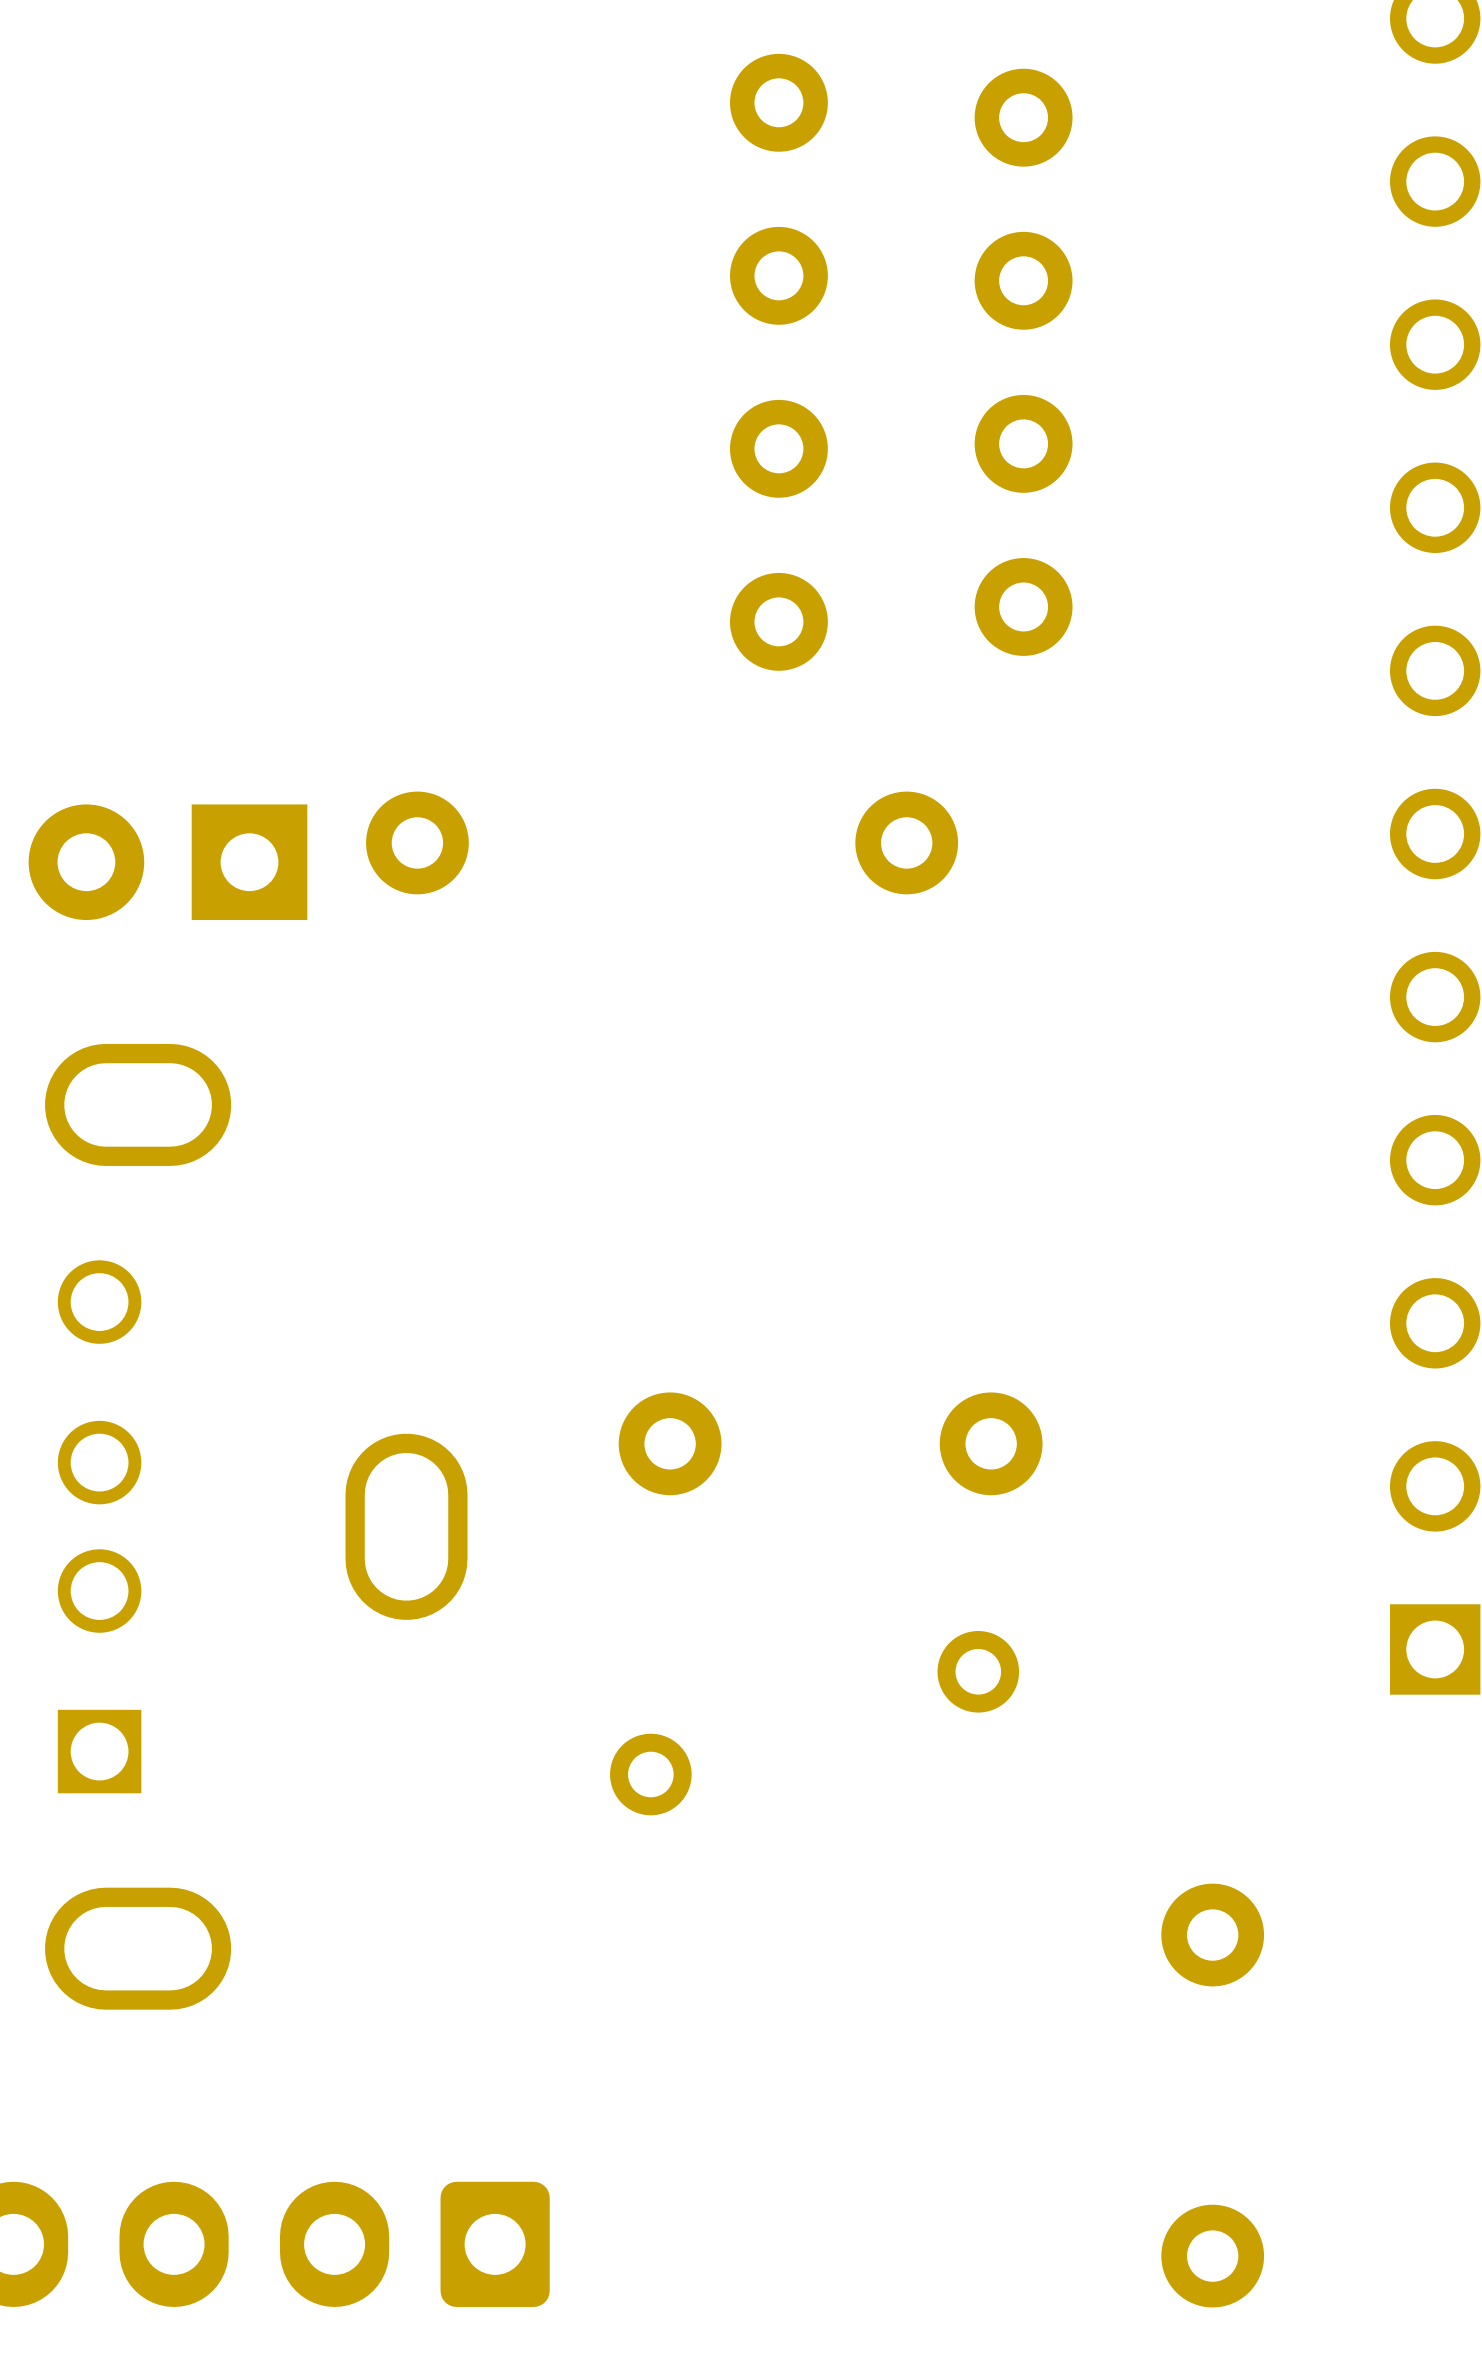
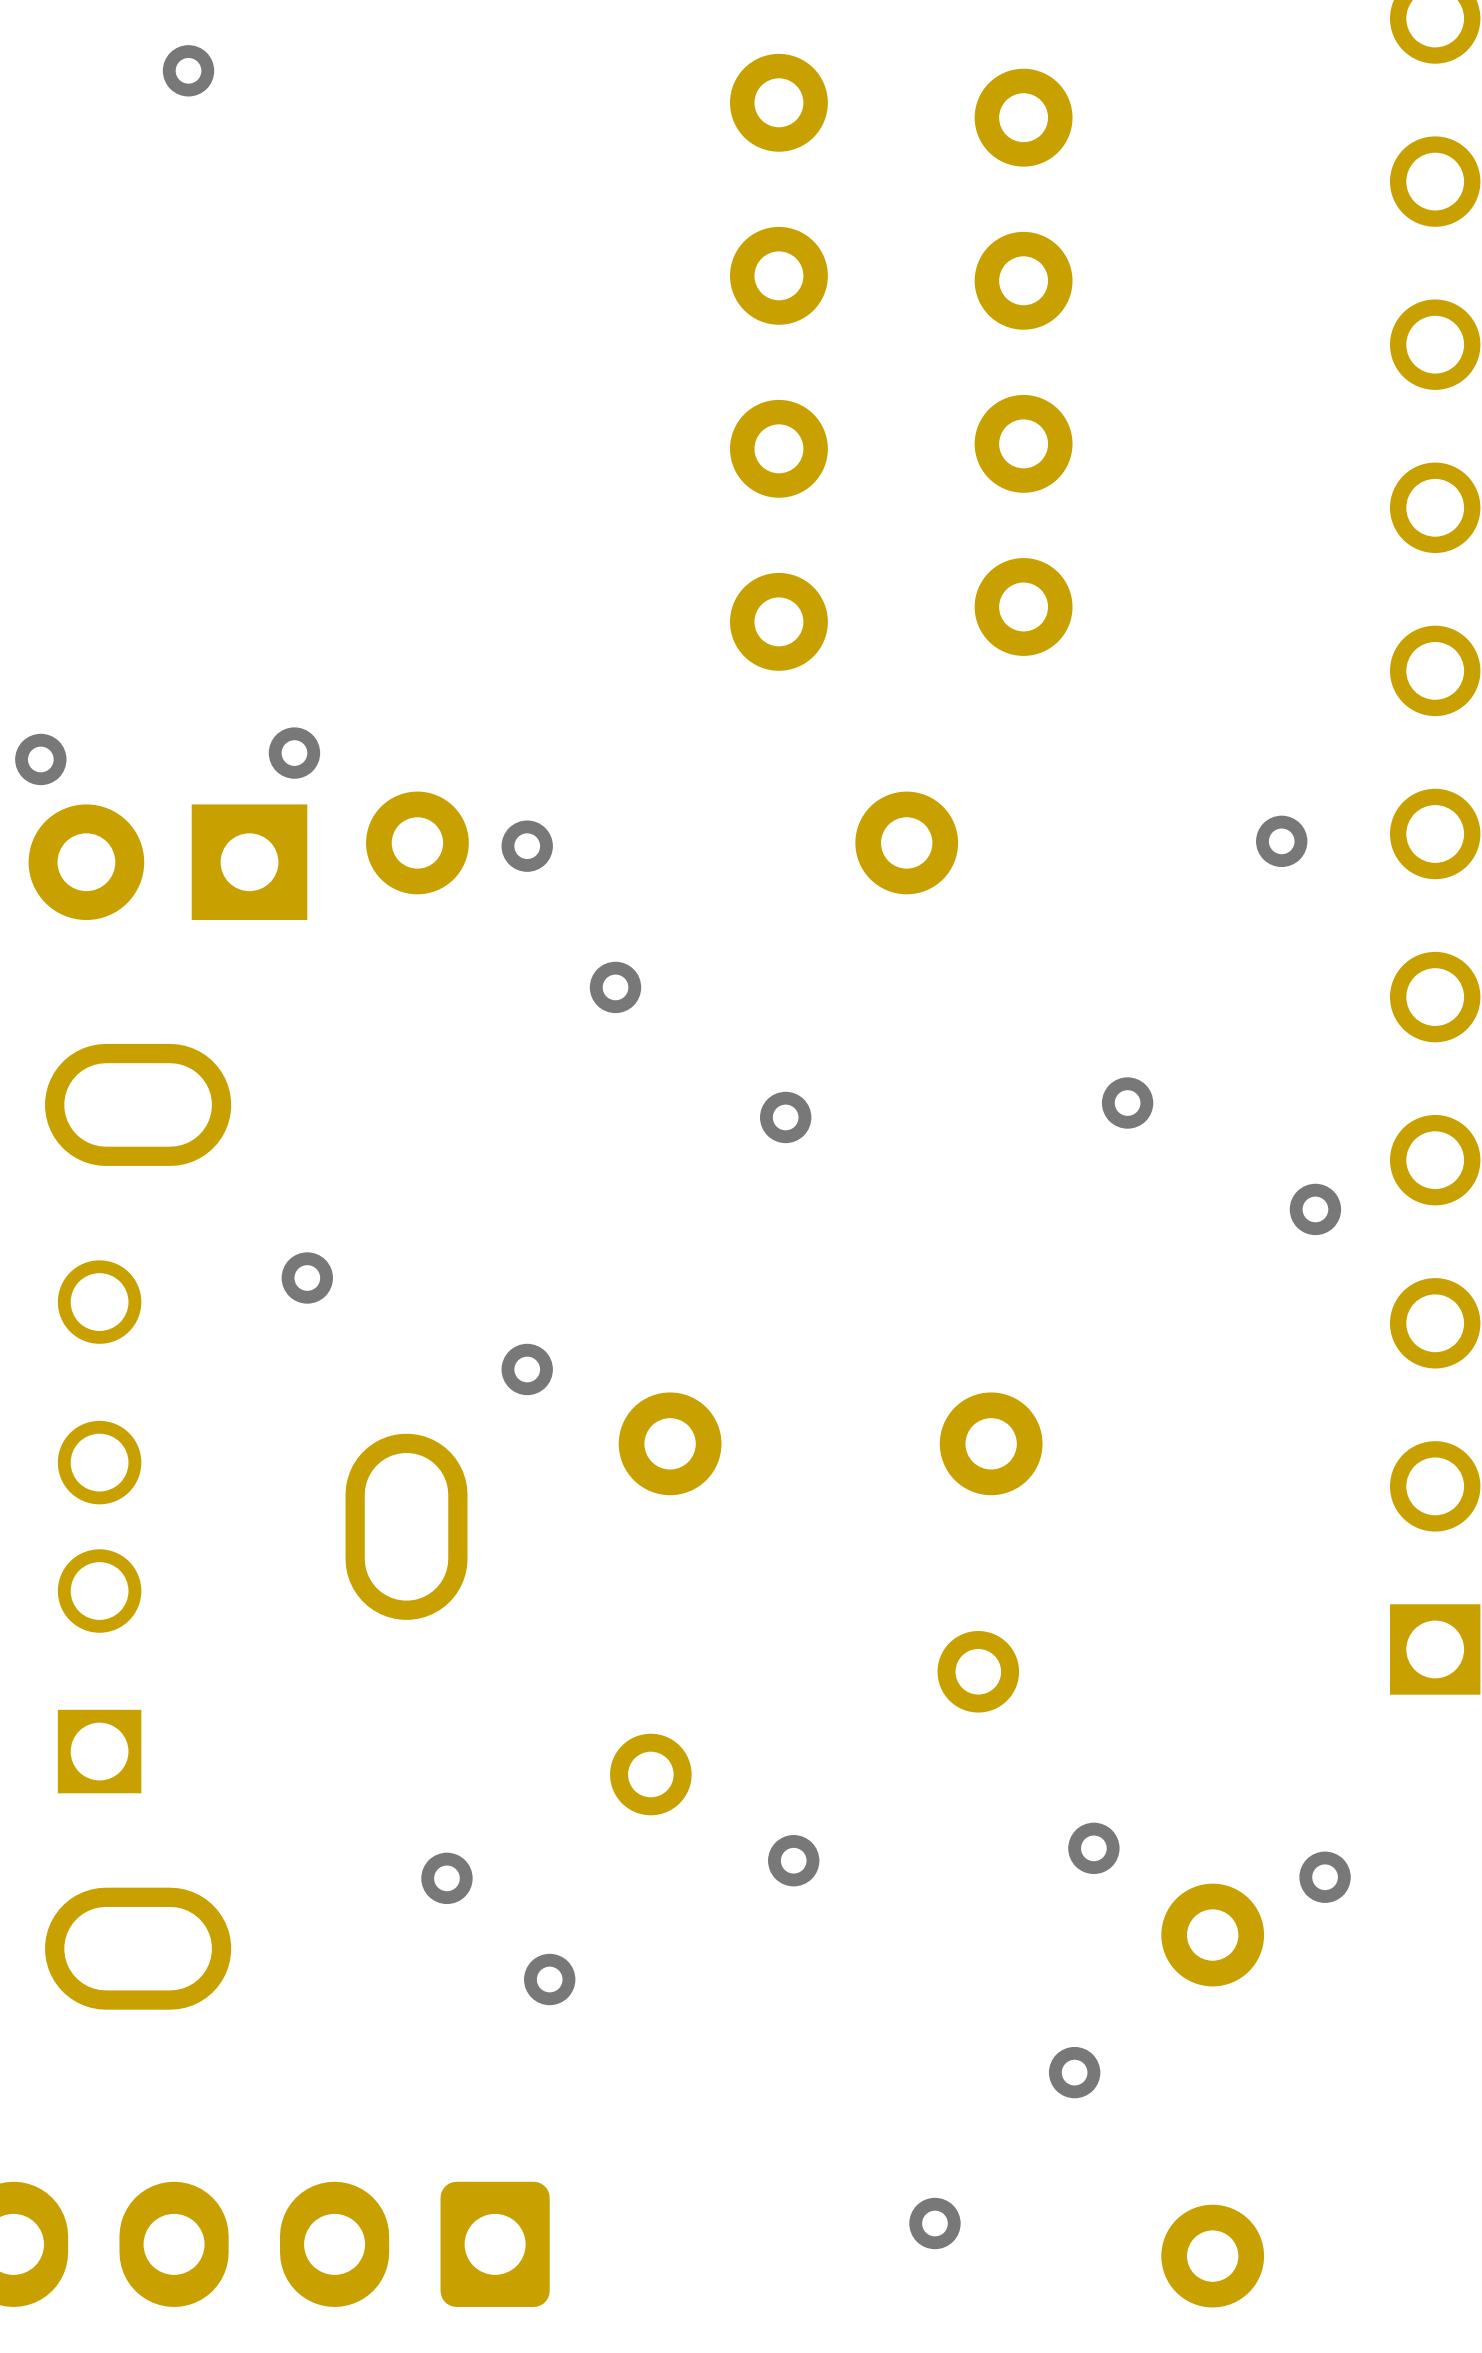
via: none -> (188, 70)
via: none -> (294, 753)
via: none -> (40, 759)
via: none -> (1281, 841)
via: none -> (527, 846)
via: none -> (615, 987)
via: none -> (1127, 1103)
via: none -> (785, 1117)
via: none -> (1315, 1209)
via: none -> (307, 1277)
via: none -> (527, 1369)
via: none -> (1093, 1848)
via: none -> (793, 1860)
via: none -> (1325, 1877)
via: none -> (446, 1878)
via: none -> (549, 1979)
via: none -> (1074, 2072)
via: none -> (934, 2223)

